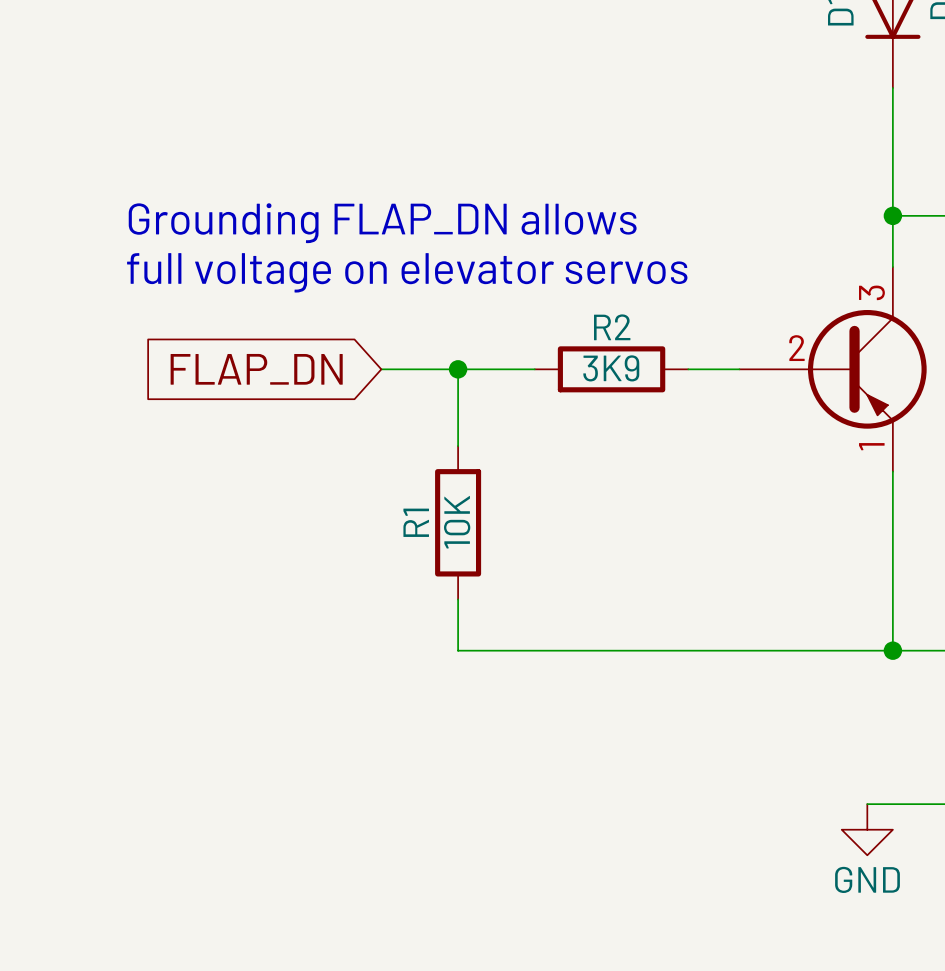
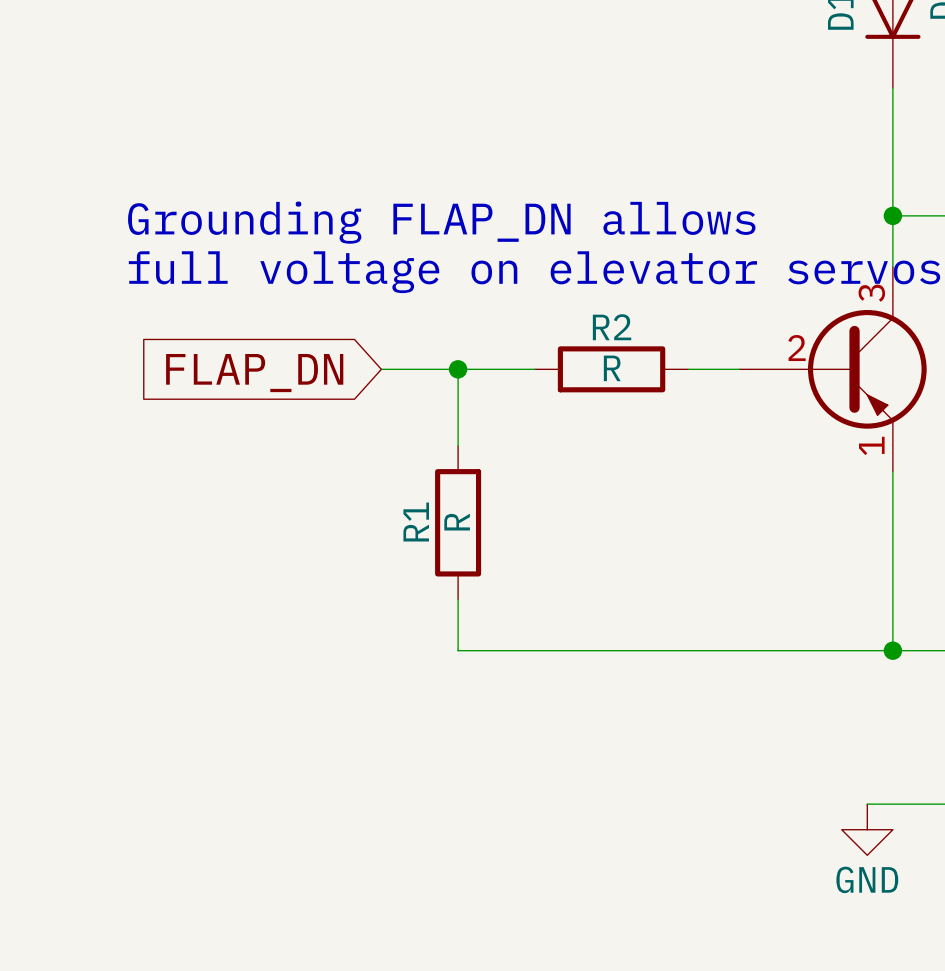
R2 value: 3K9 (611, 368) -> R (612, 368)
R1 value: 10K (457, 522) -> R (457, 522)

